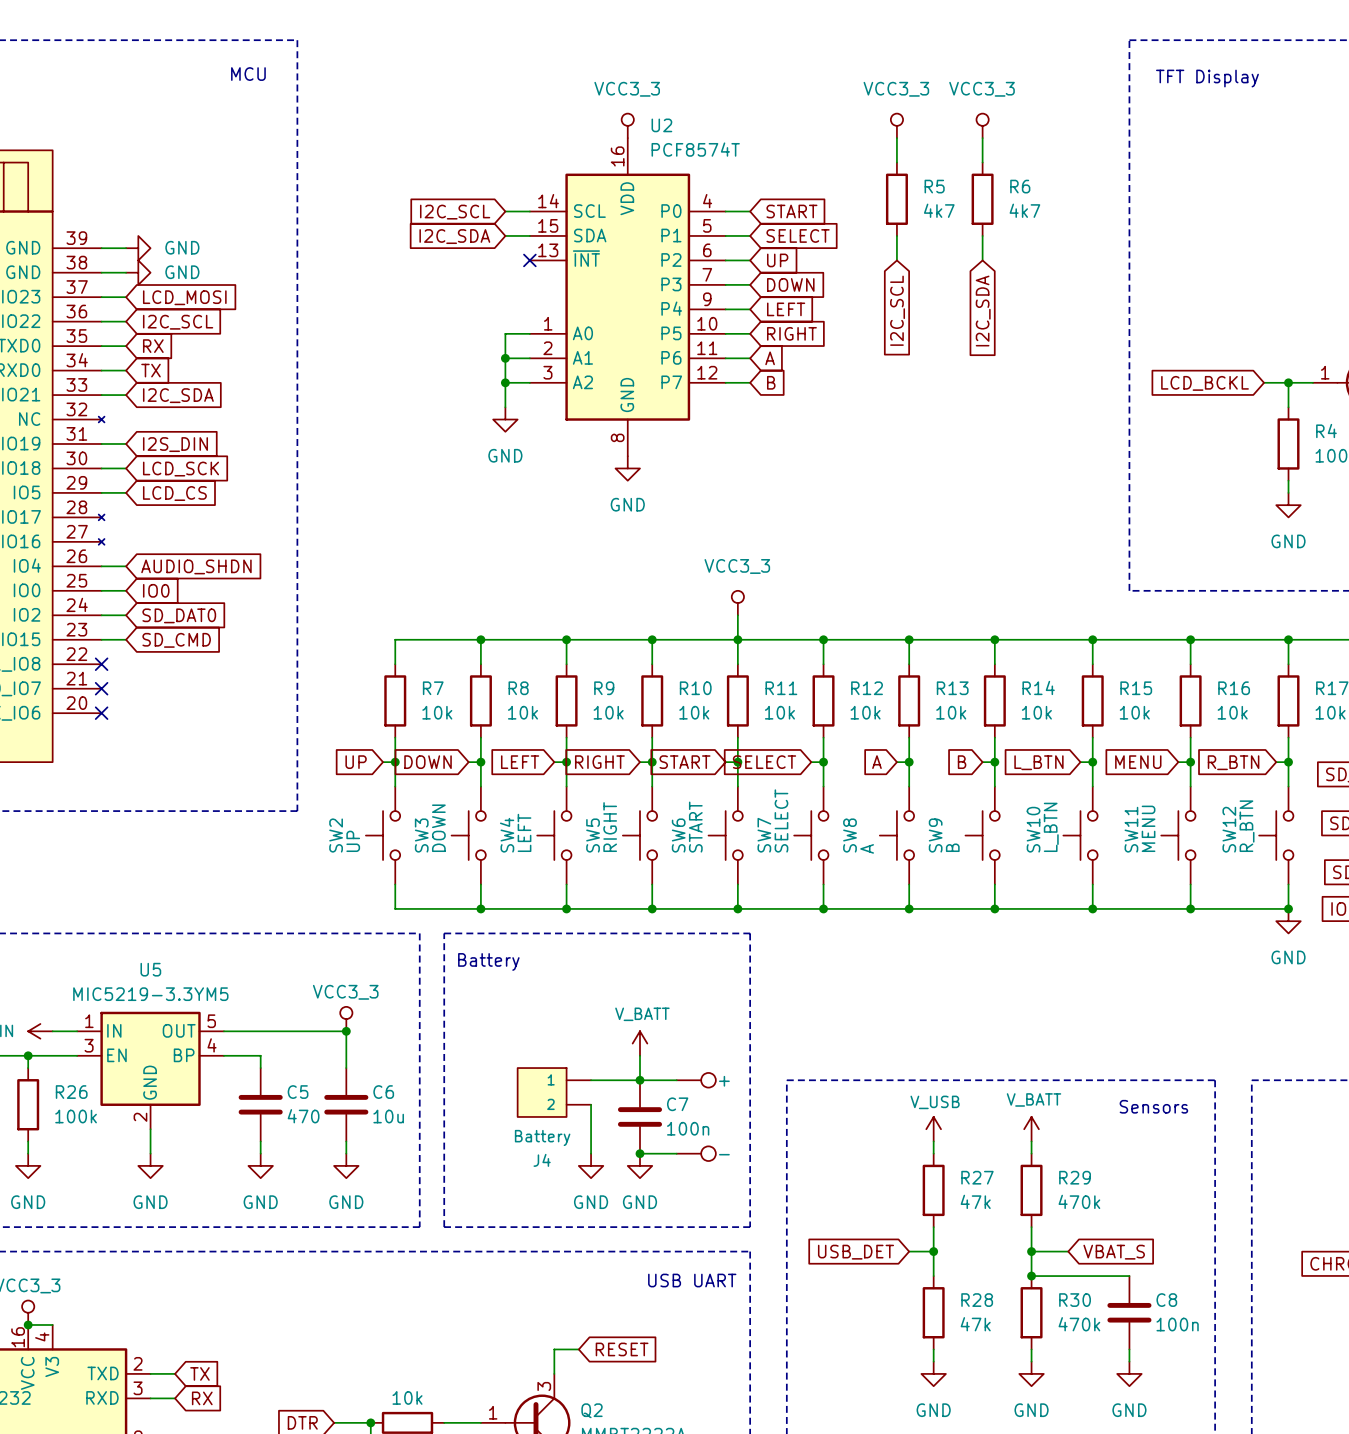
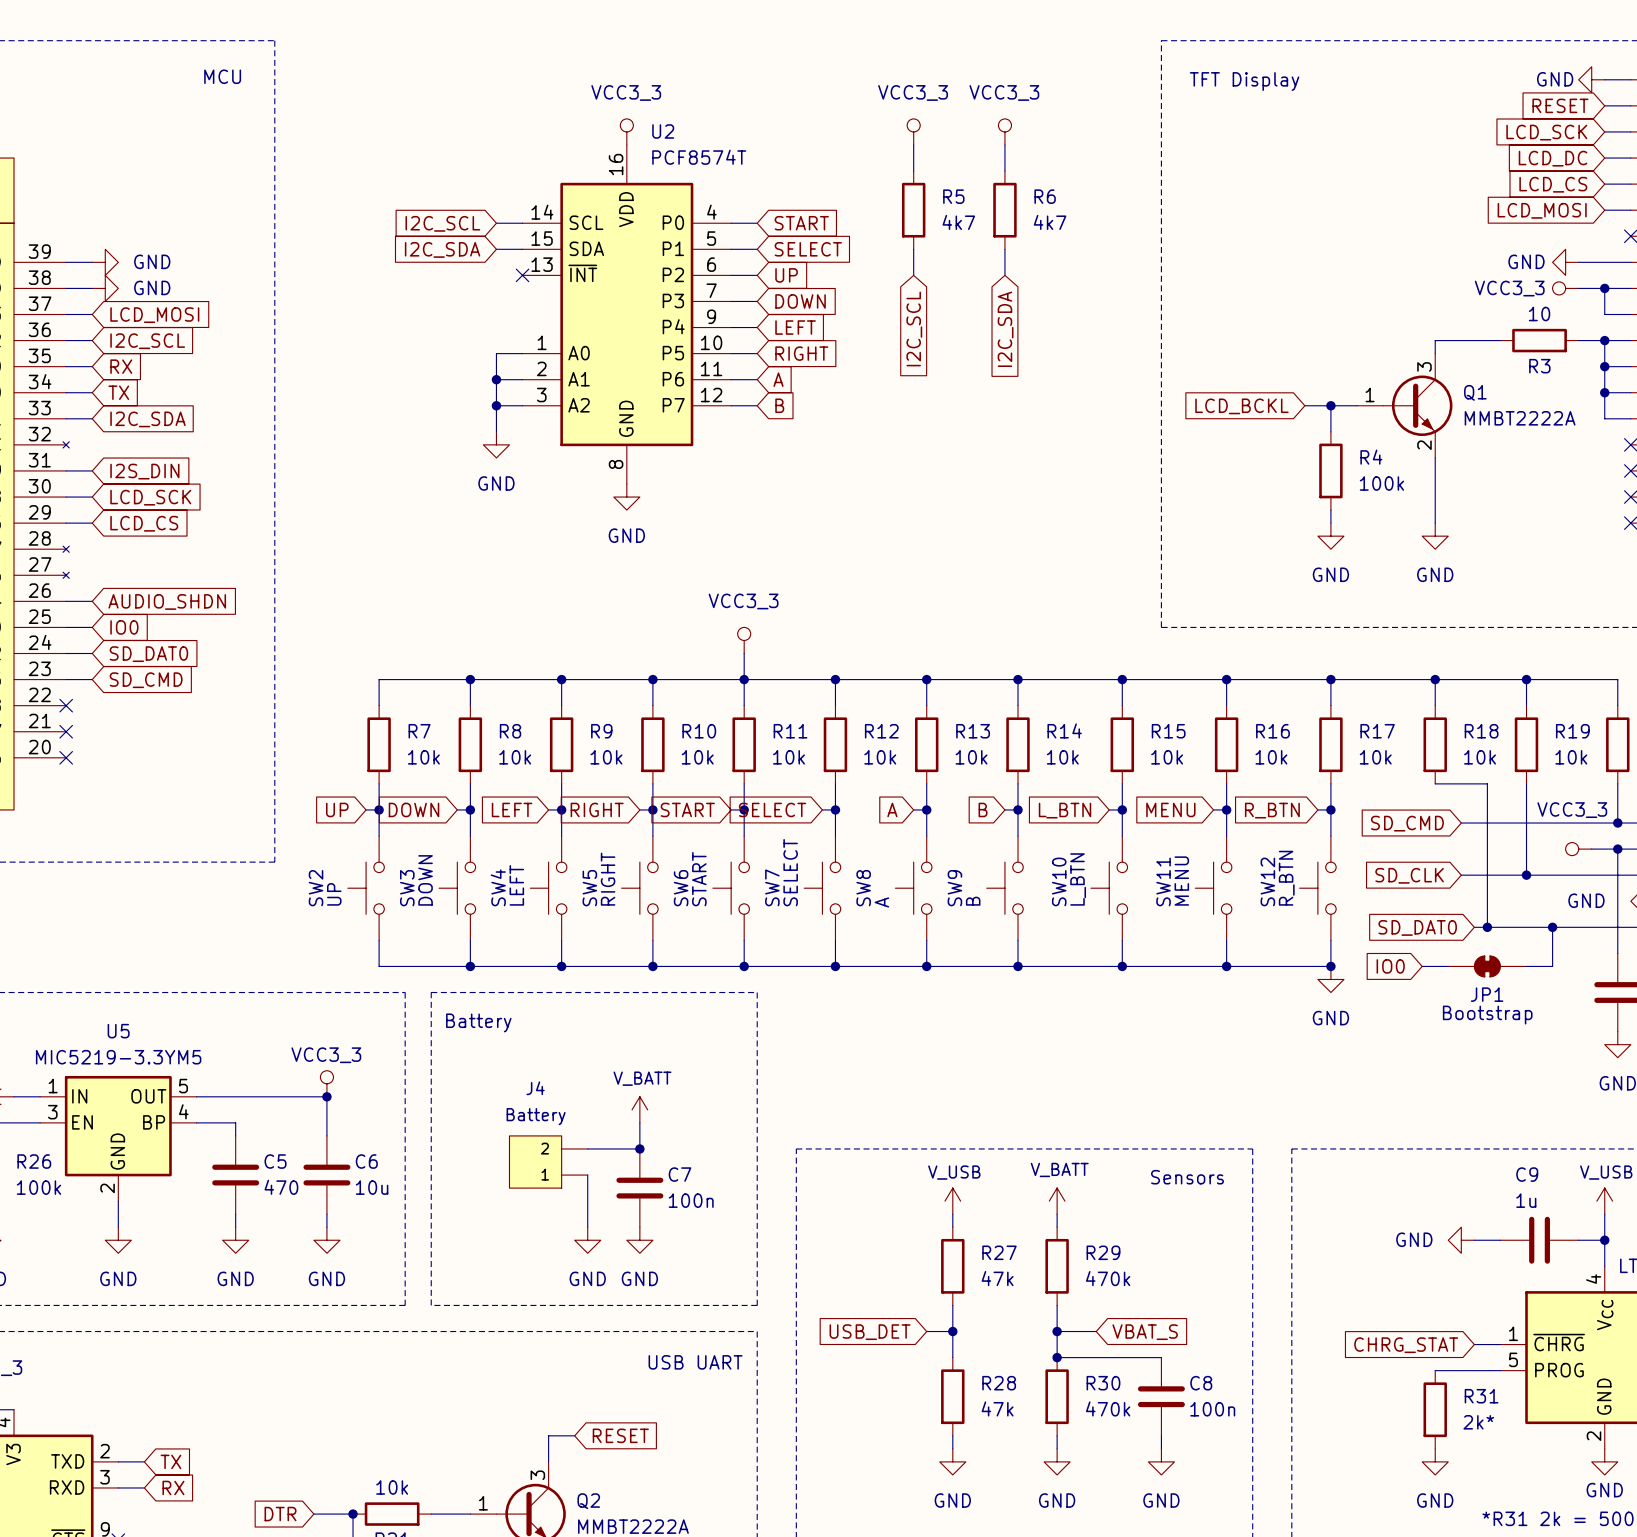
wire: (639, 1080) (676, 1080) -> none
part: + (696, 1080) -> none
J4 flip: as is (542, 1092) -> up-down (535, 1162)
wire: (639, 1153) (676, 1153) -> none
junction: (639, 1153) -> none
part: - (696, 1153) -> none

